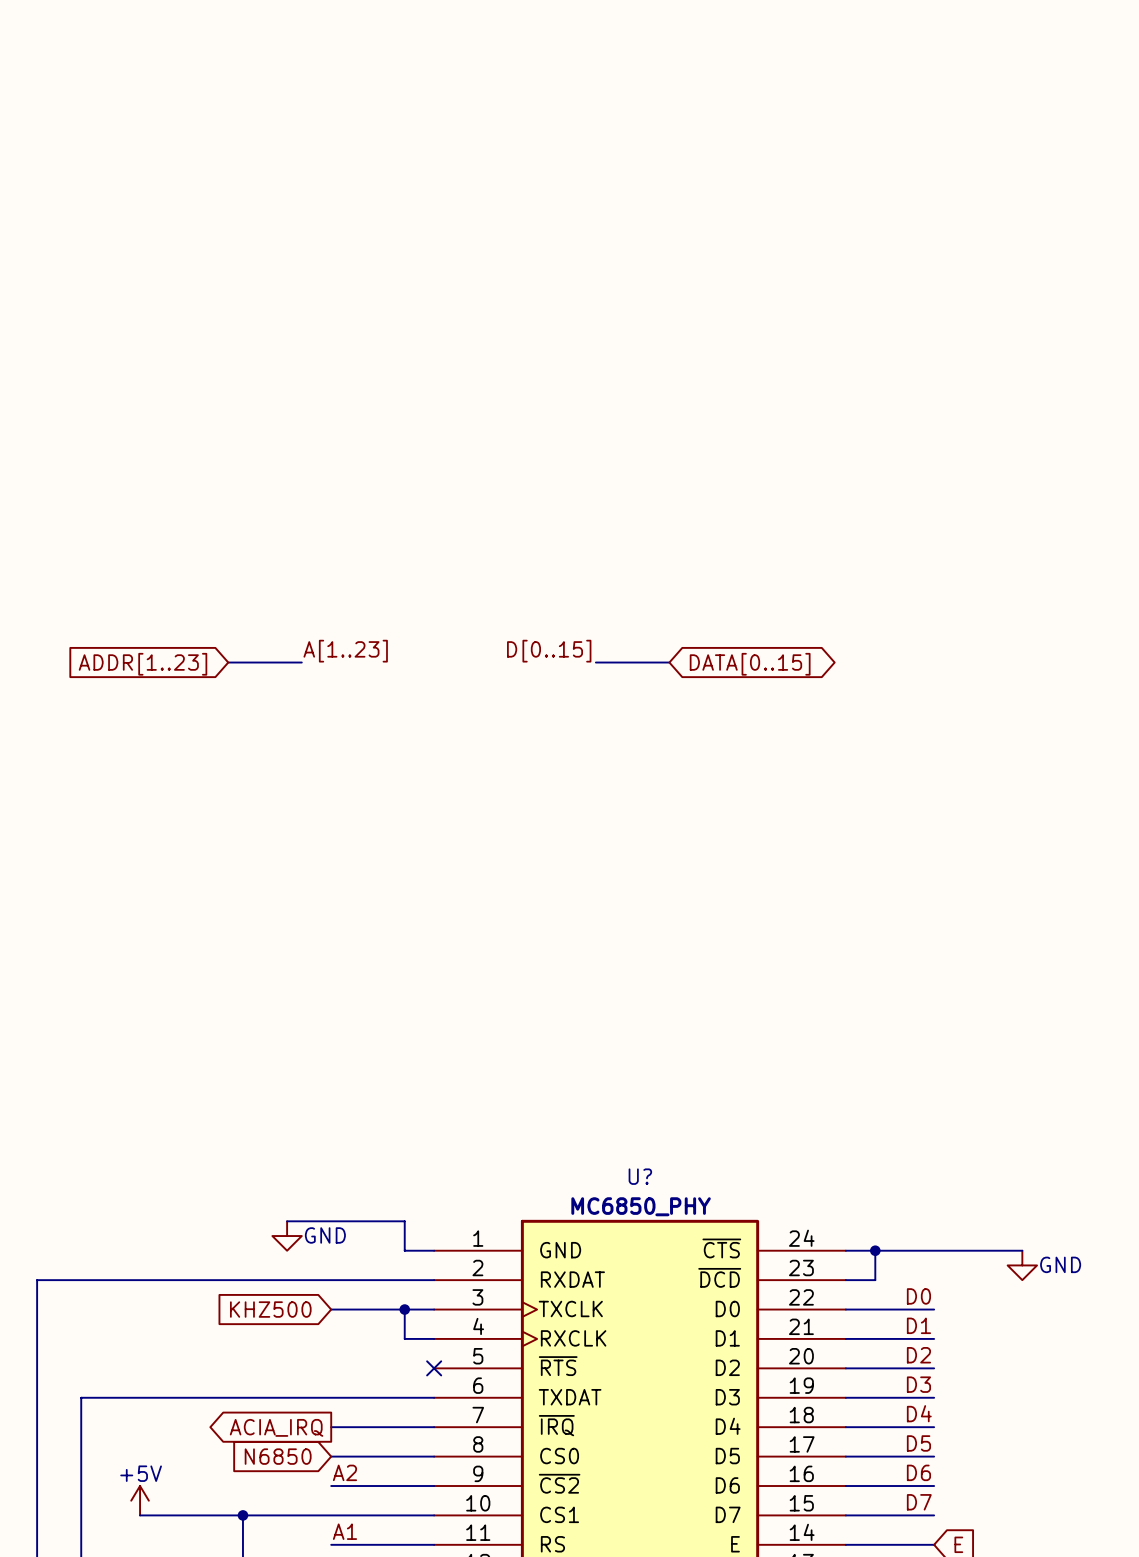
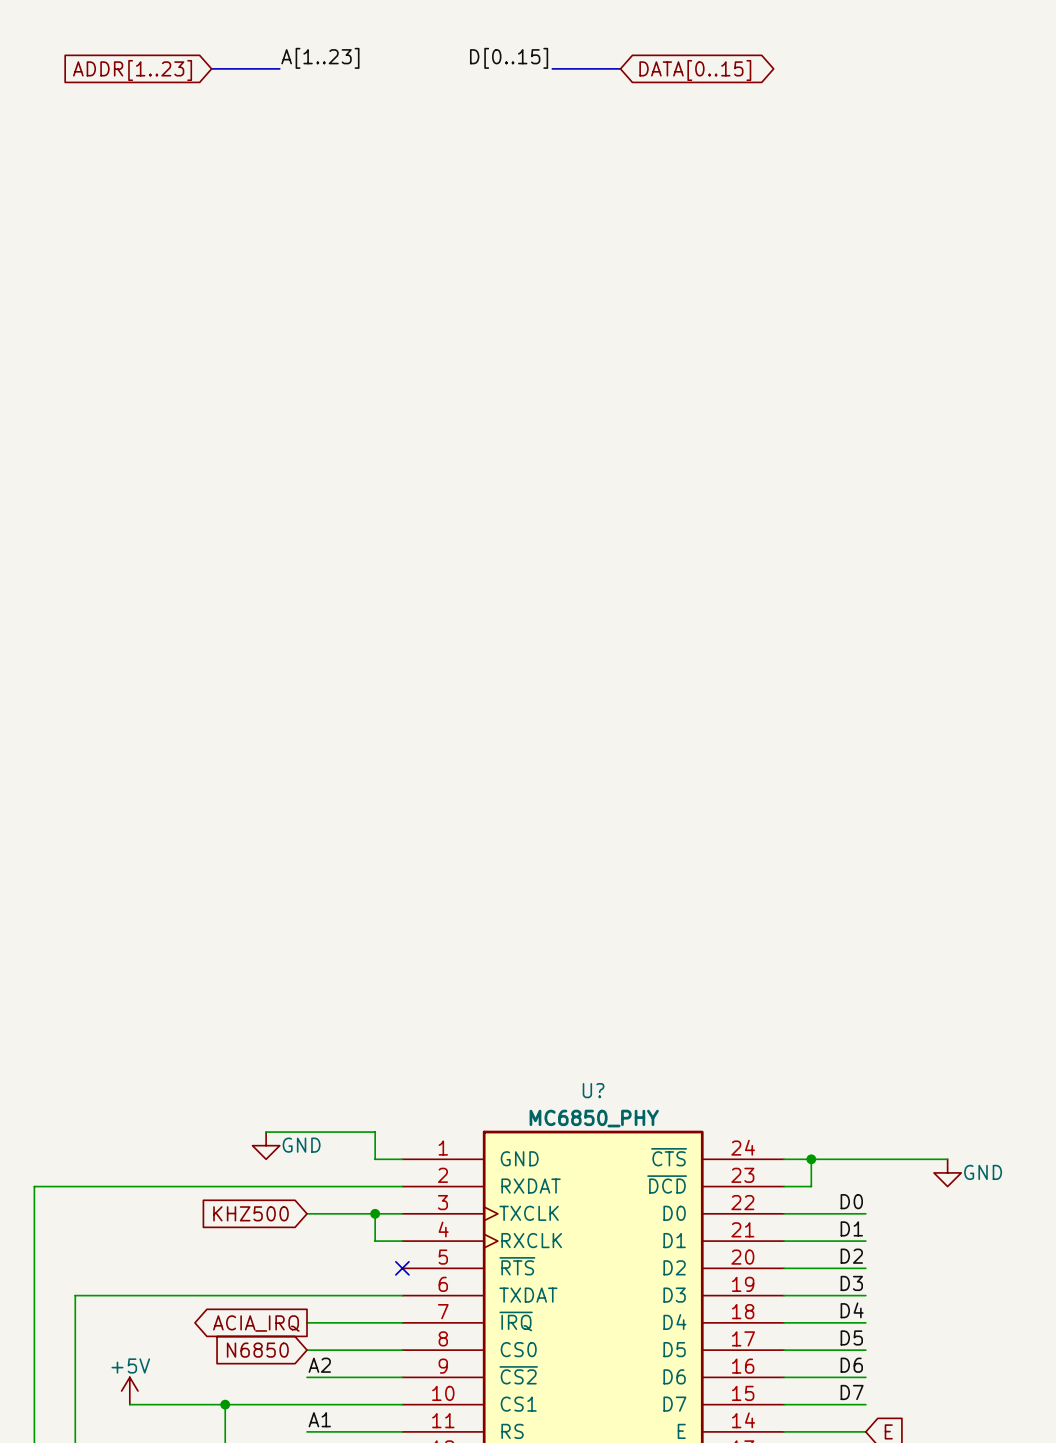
label: none -> A[1..23] (320, 58)
label: none -> D[0..15] (509, 58)
bus: none -> (211, 68) (279, 68)
bus: none -> (552, 68) (620, 68)
global label: none -> ADDR[1..23] (132, 70)
global label: none -> DATA[0..15] (695, 70)
label: A[1..23] (345, 651) -> none
label: D[0..15] (549, 651) -> none
bus: (228, 662) (301, 662) -> none
bus: (595, 662) (669, 662) -> none
global label: ADDR[1..23] (143, 664) -> none
global label: DATA[0..15] (750, 664) -> none

